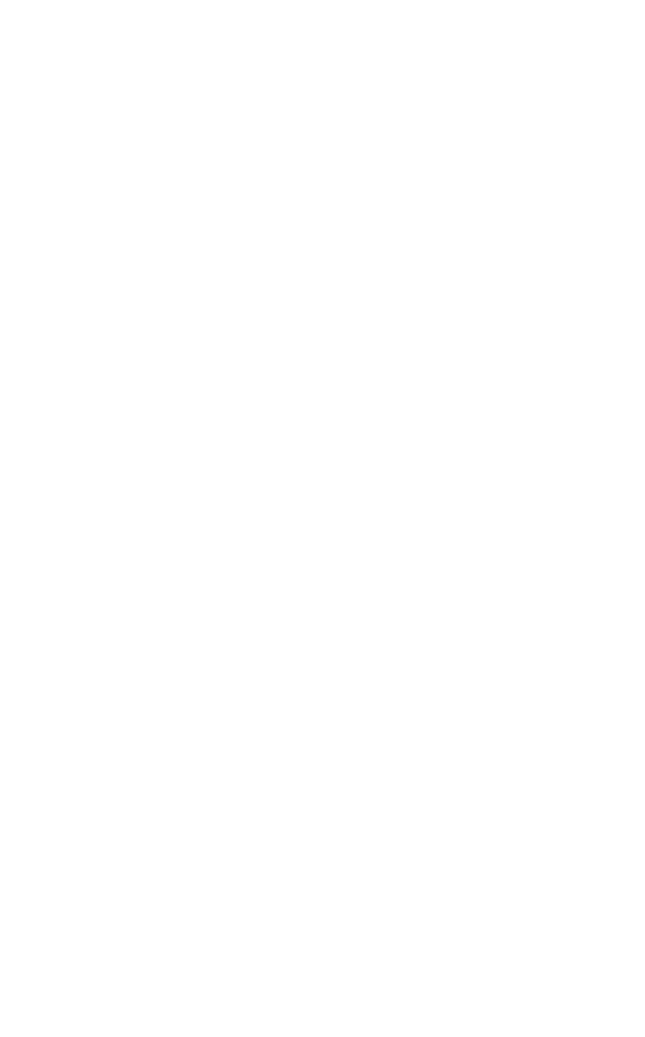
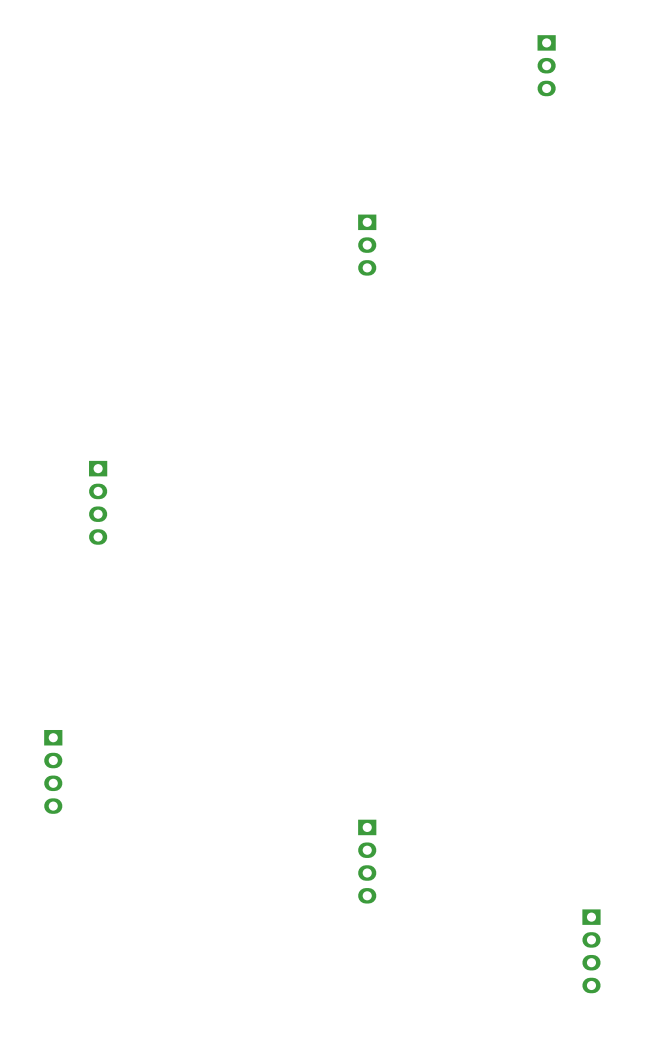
part: none -> (546, 65)
part: none -> (367, 245)
part: none -> (98, 502)
part: none -> (53, 771)
part: none -> (367, 861)
part: none -> (591, 951)

